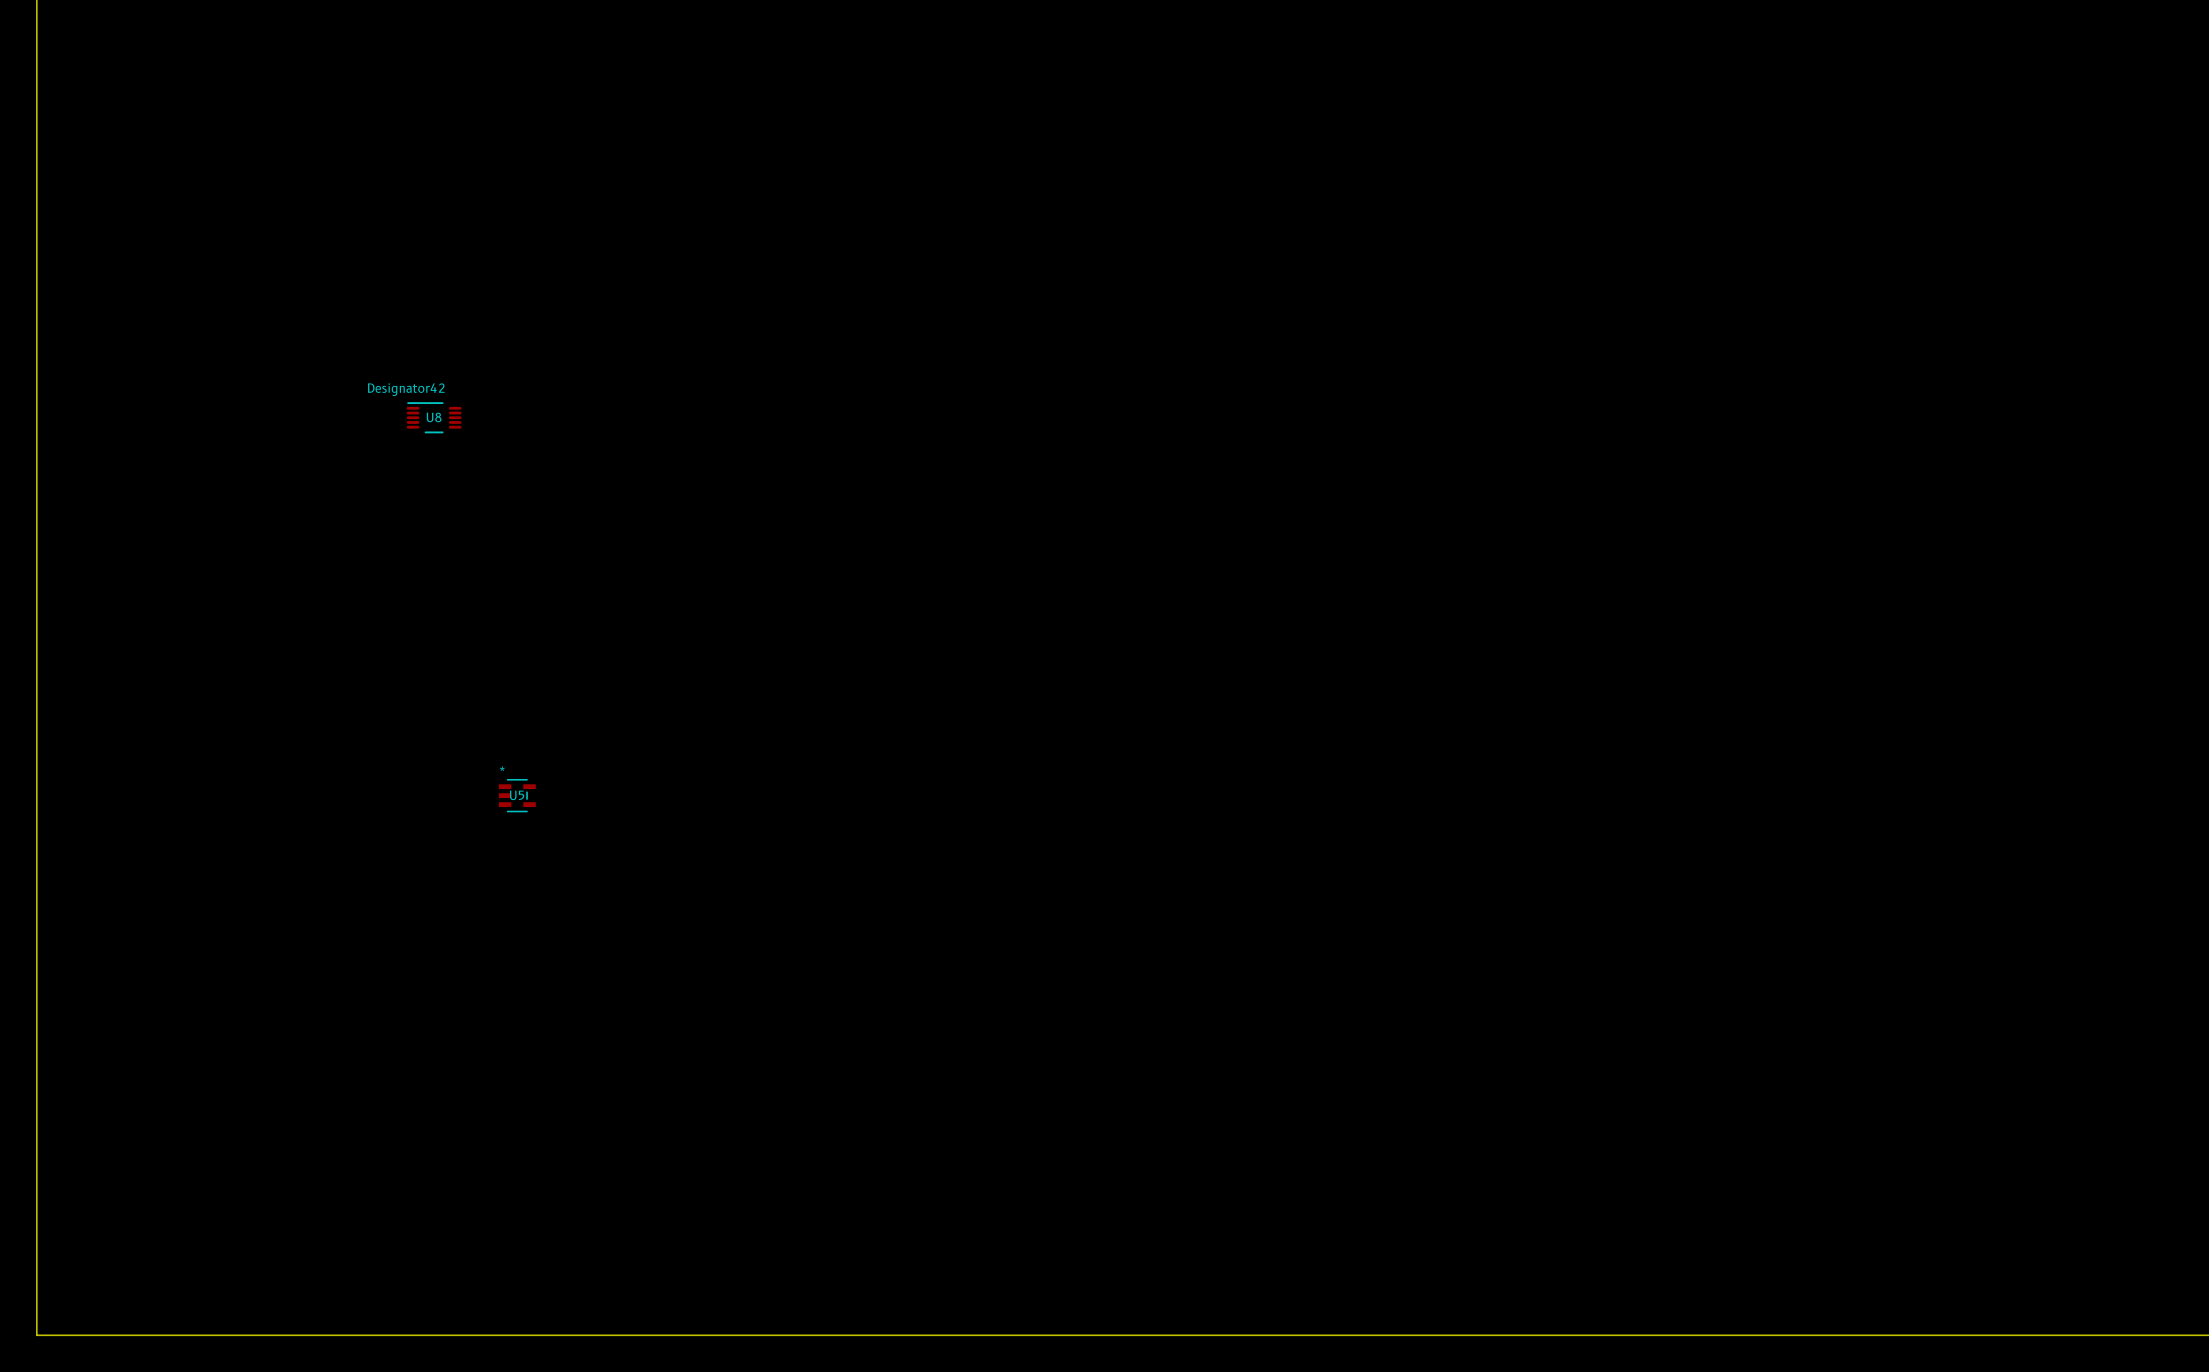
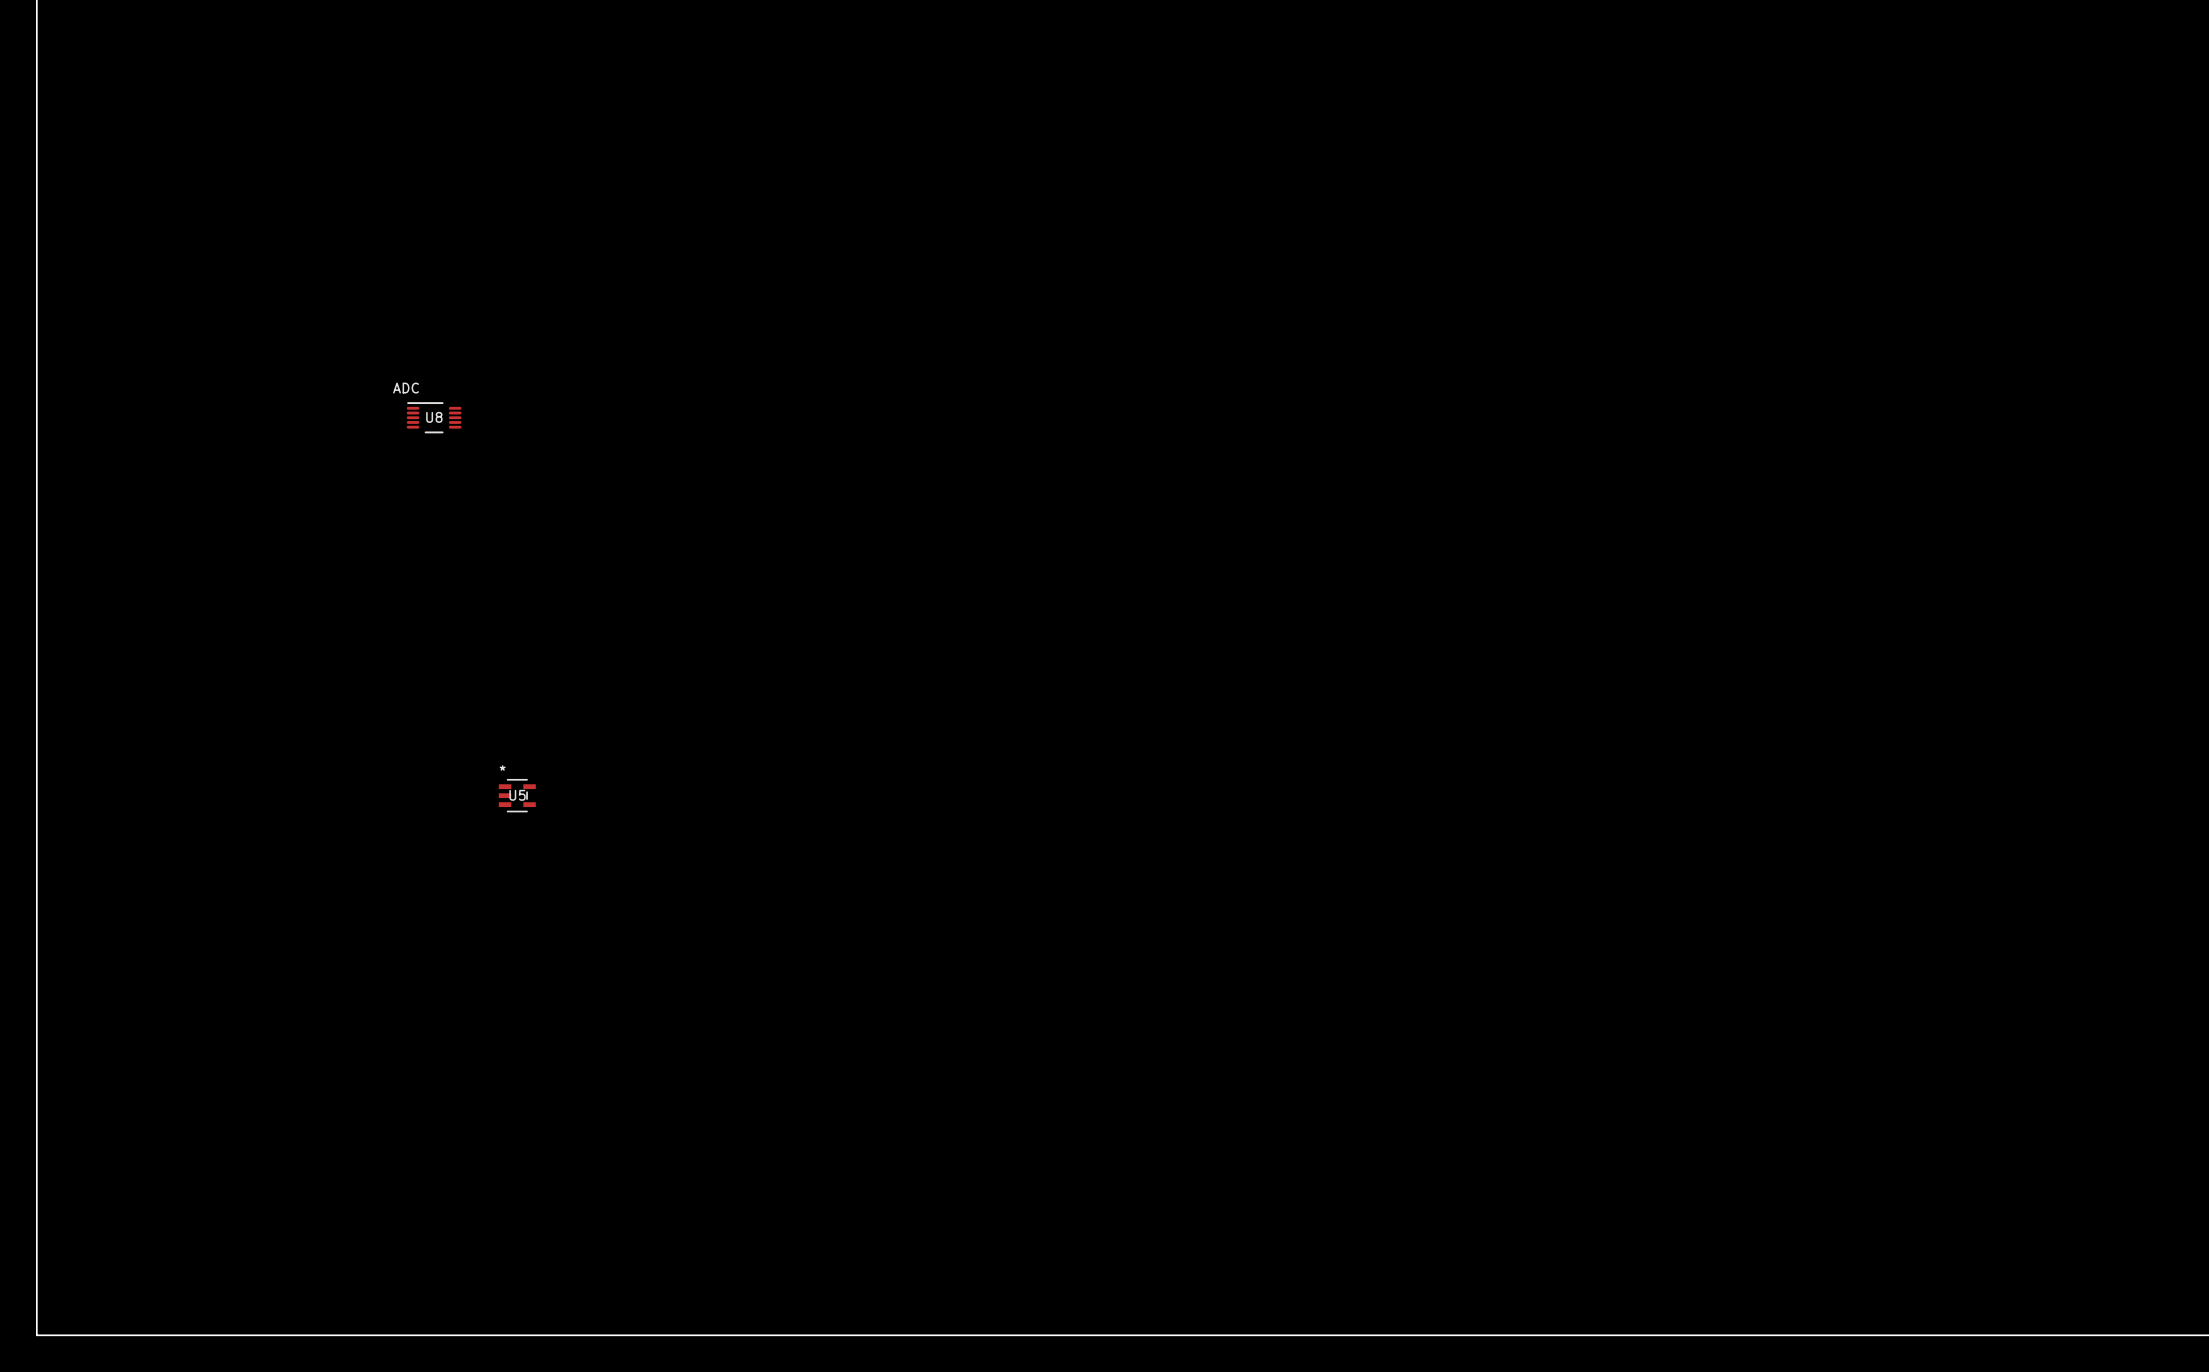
U8 text: Designator42 (406, 389) -> ADC (406, 388)

